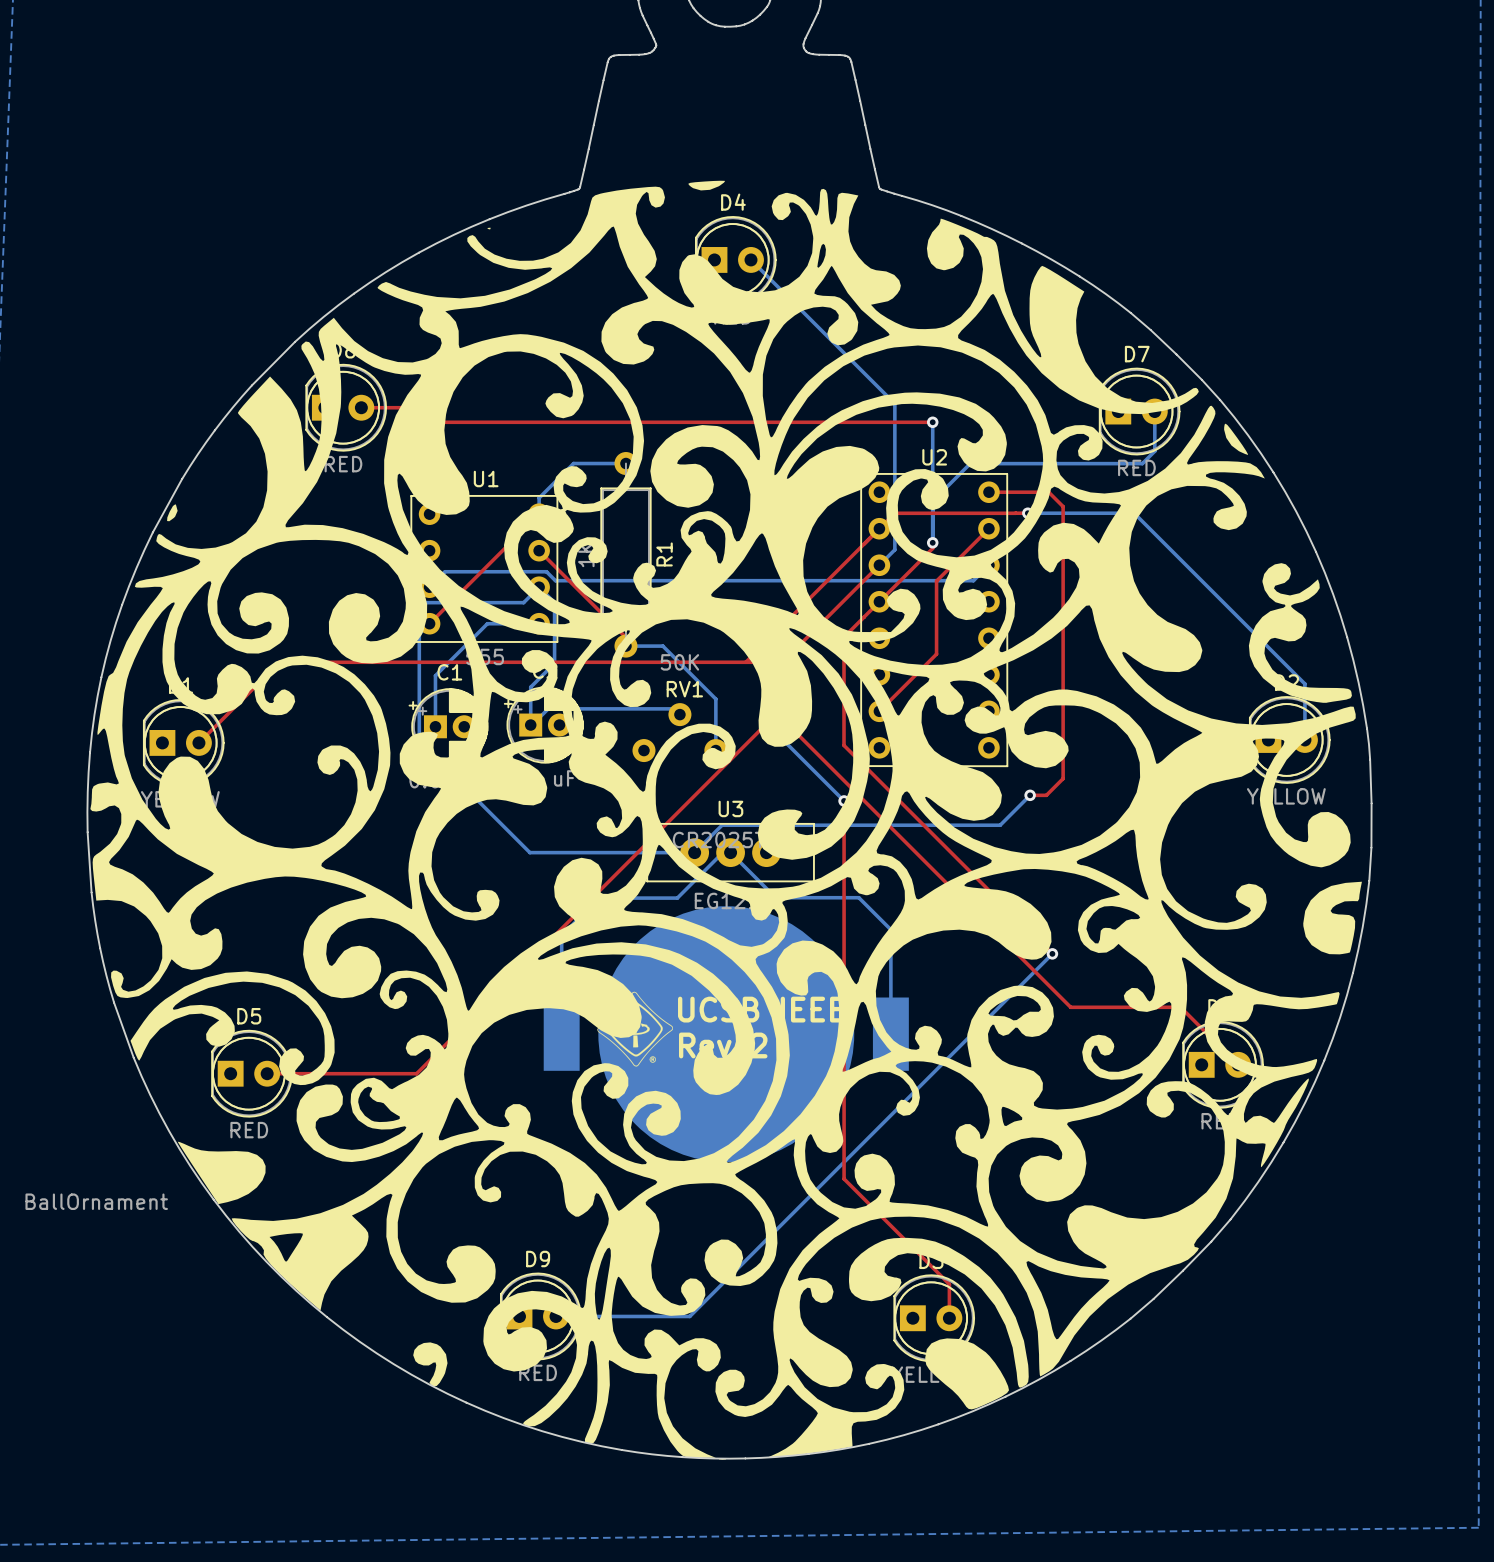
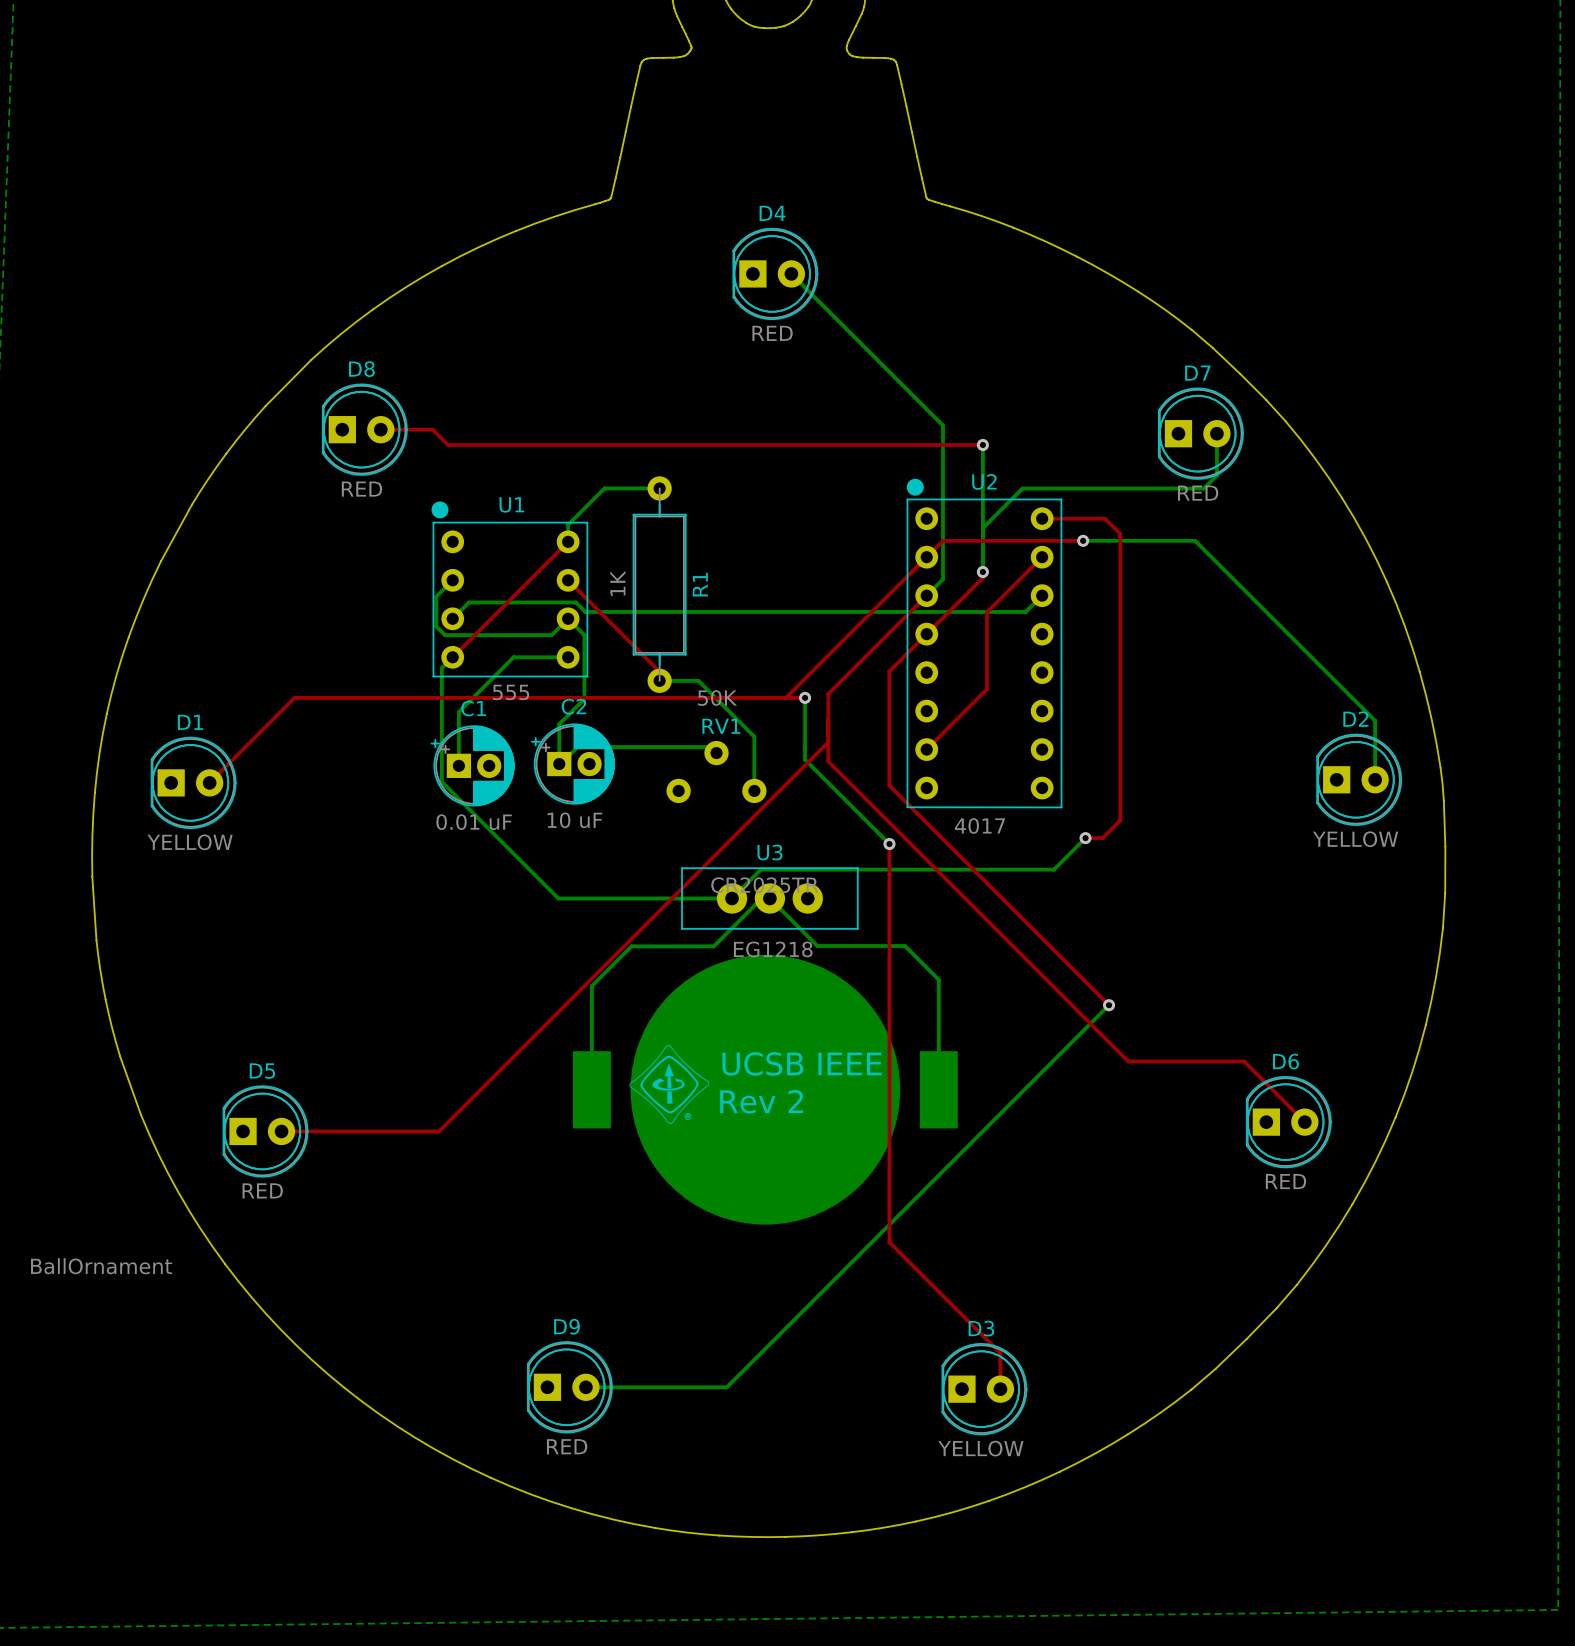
drawing: [90, 180, 1362, 1460] -> none

